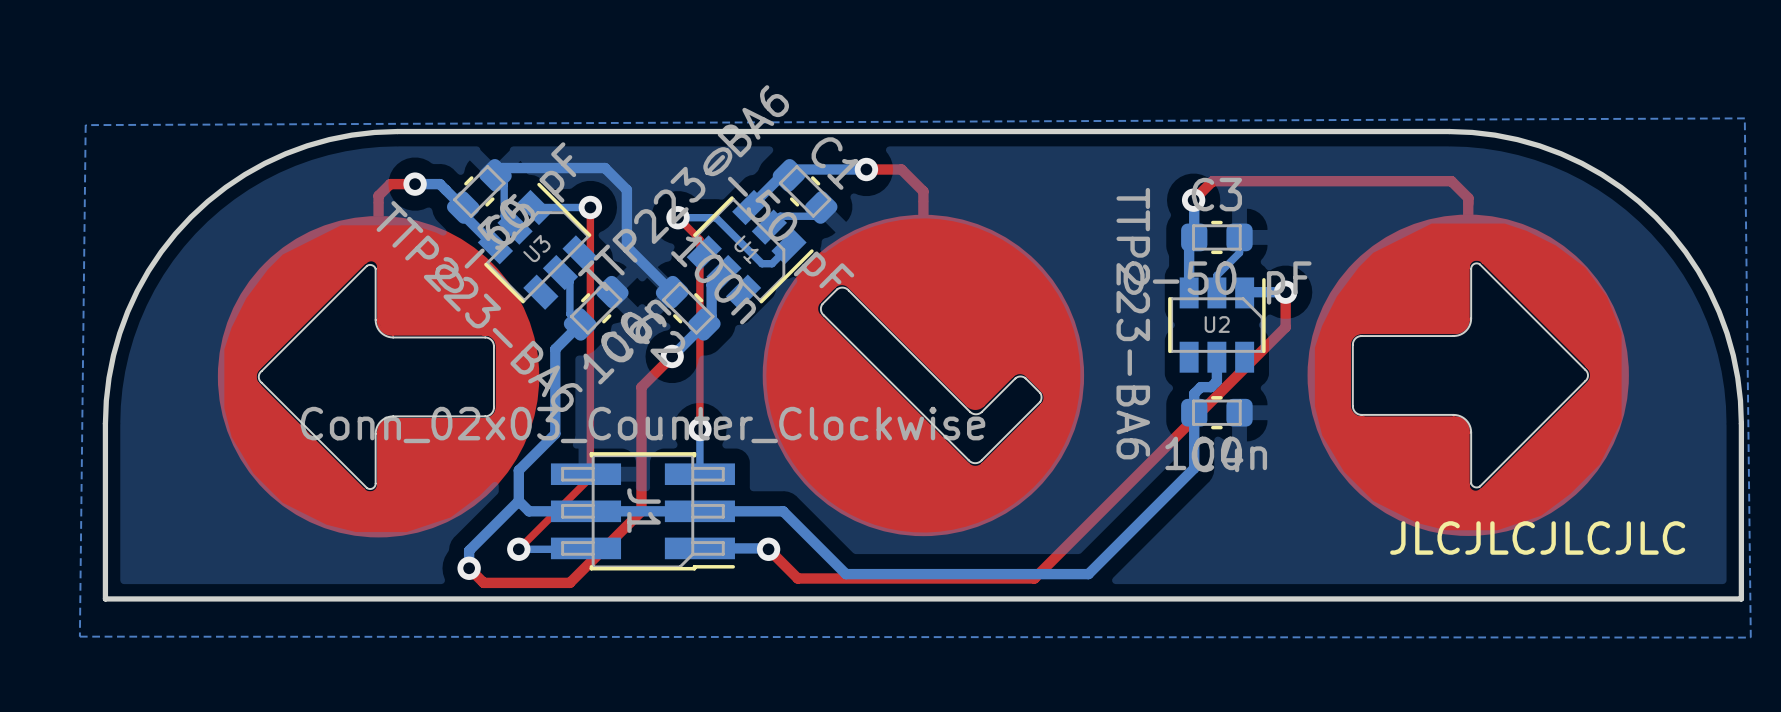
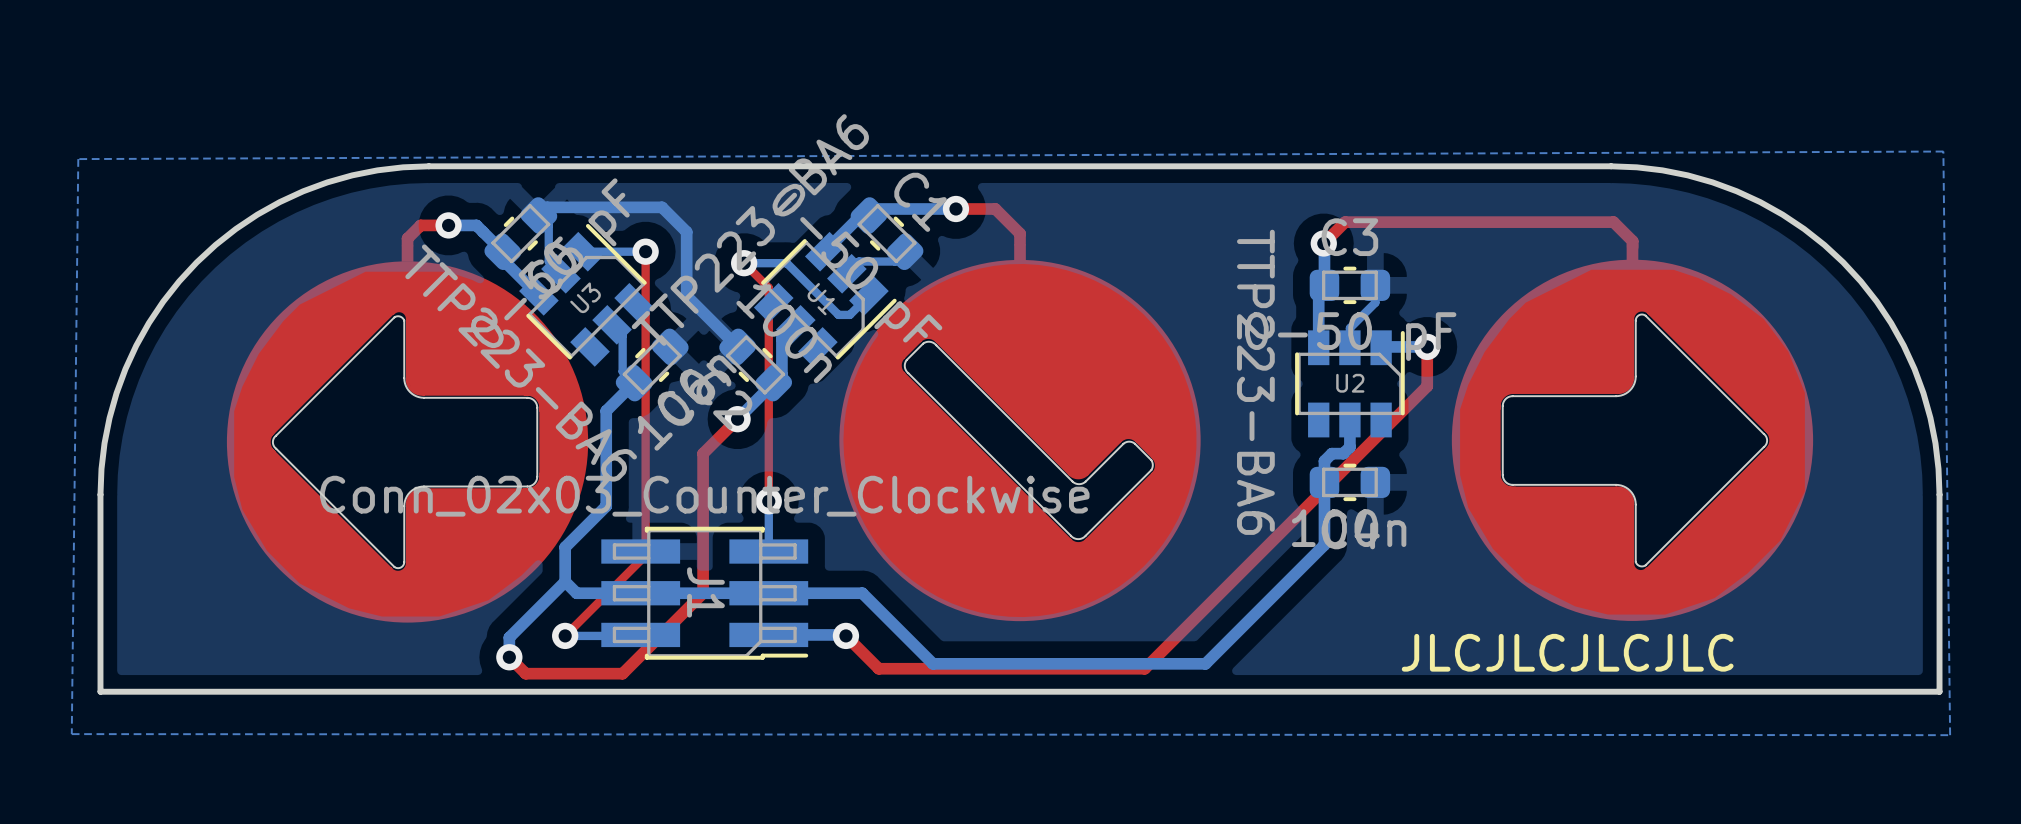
text position: JLCJLCJLCJLC (1537, 537) -> JLCJLCJLCJLC (1567, 652)

